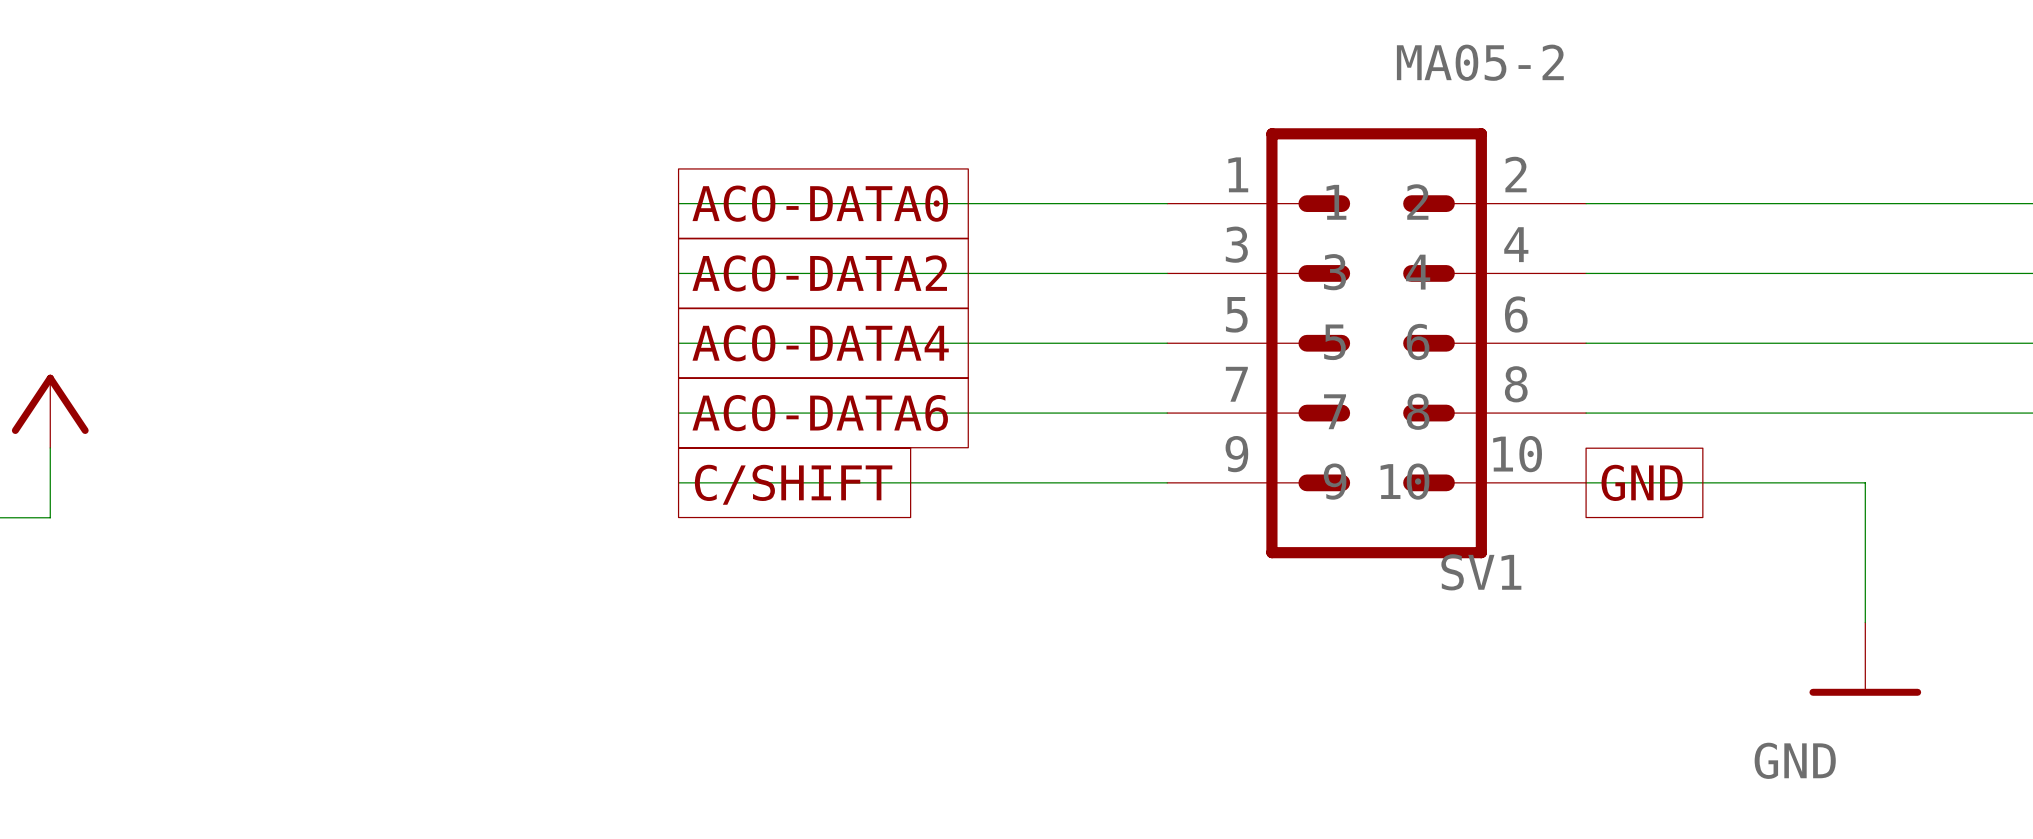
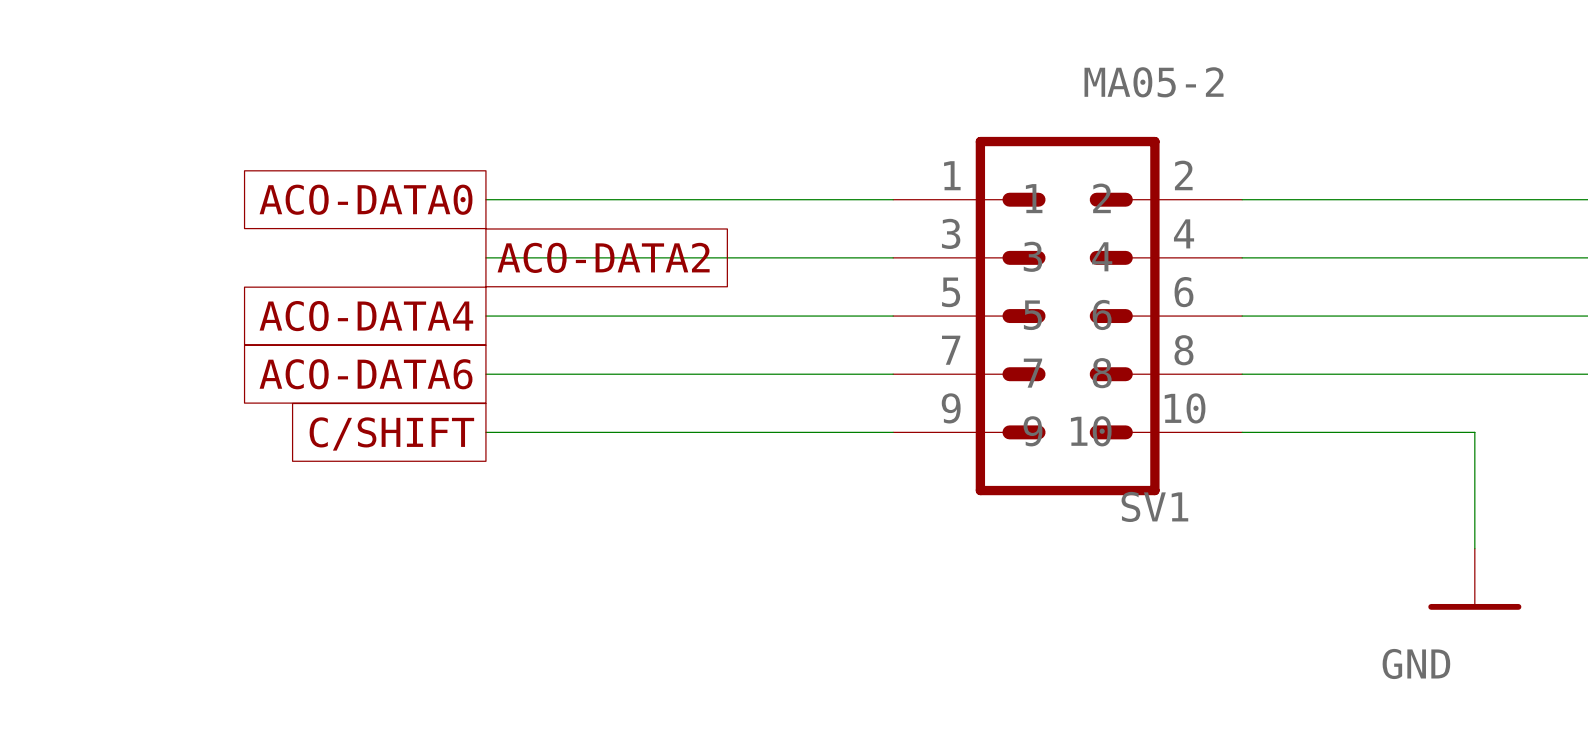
global label rotation: 0° (820, 203) -> 180° (366, 199)
global label position: ACO-DATA0 (820, 203) -> ACO-DATA0 (366, 199)
global label rotation: 0° (820, 343) -> 180° (366, 316)
global label position: ACO-DATA4 (820, 343) -> ACO-DATA4 (366, 316)
global label rotation: 0° (820, 413) -> 180° (366, 374)
global label position: ACO-DATA6 (820, 413) -> ACO-DATA6 (366, 374)
global label: GND (1642, 482) -> none
global label rotation: 0° (793, 484) -> 180° (391, 433)

